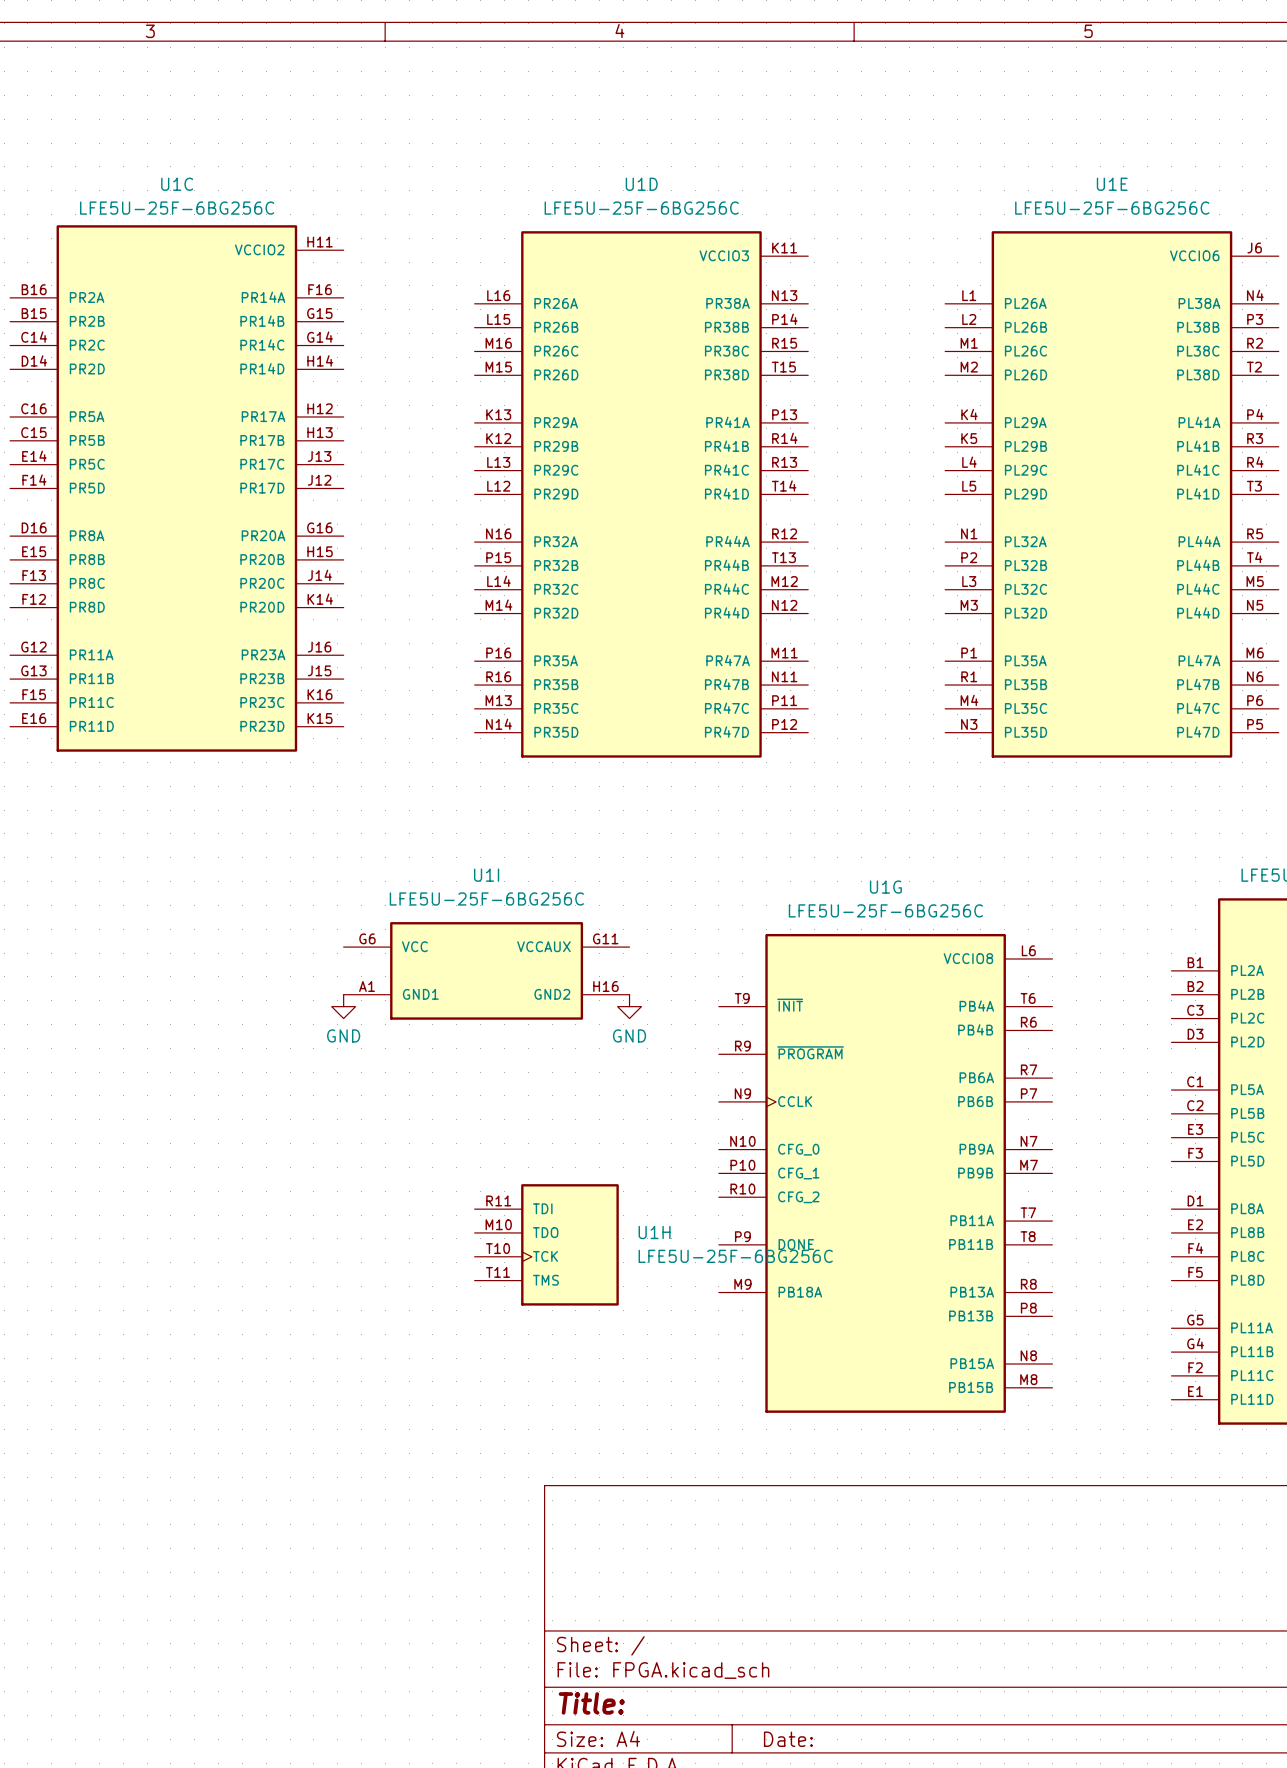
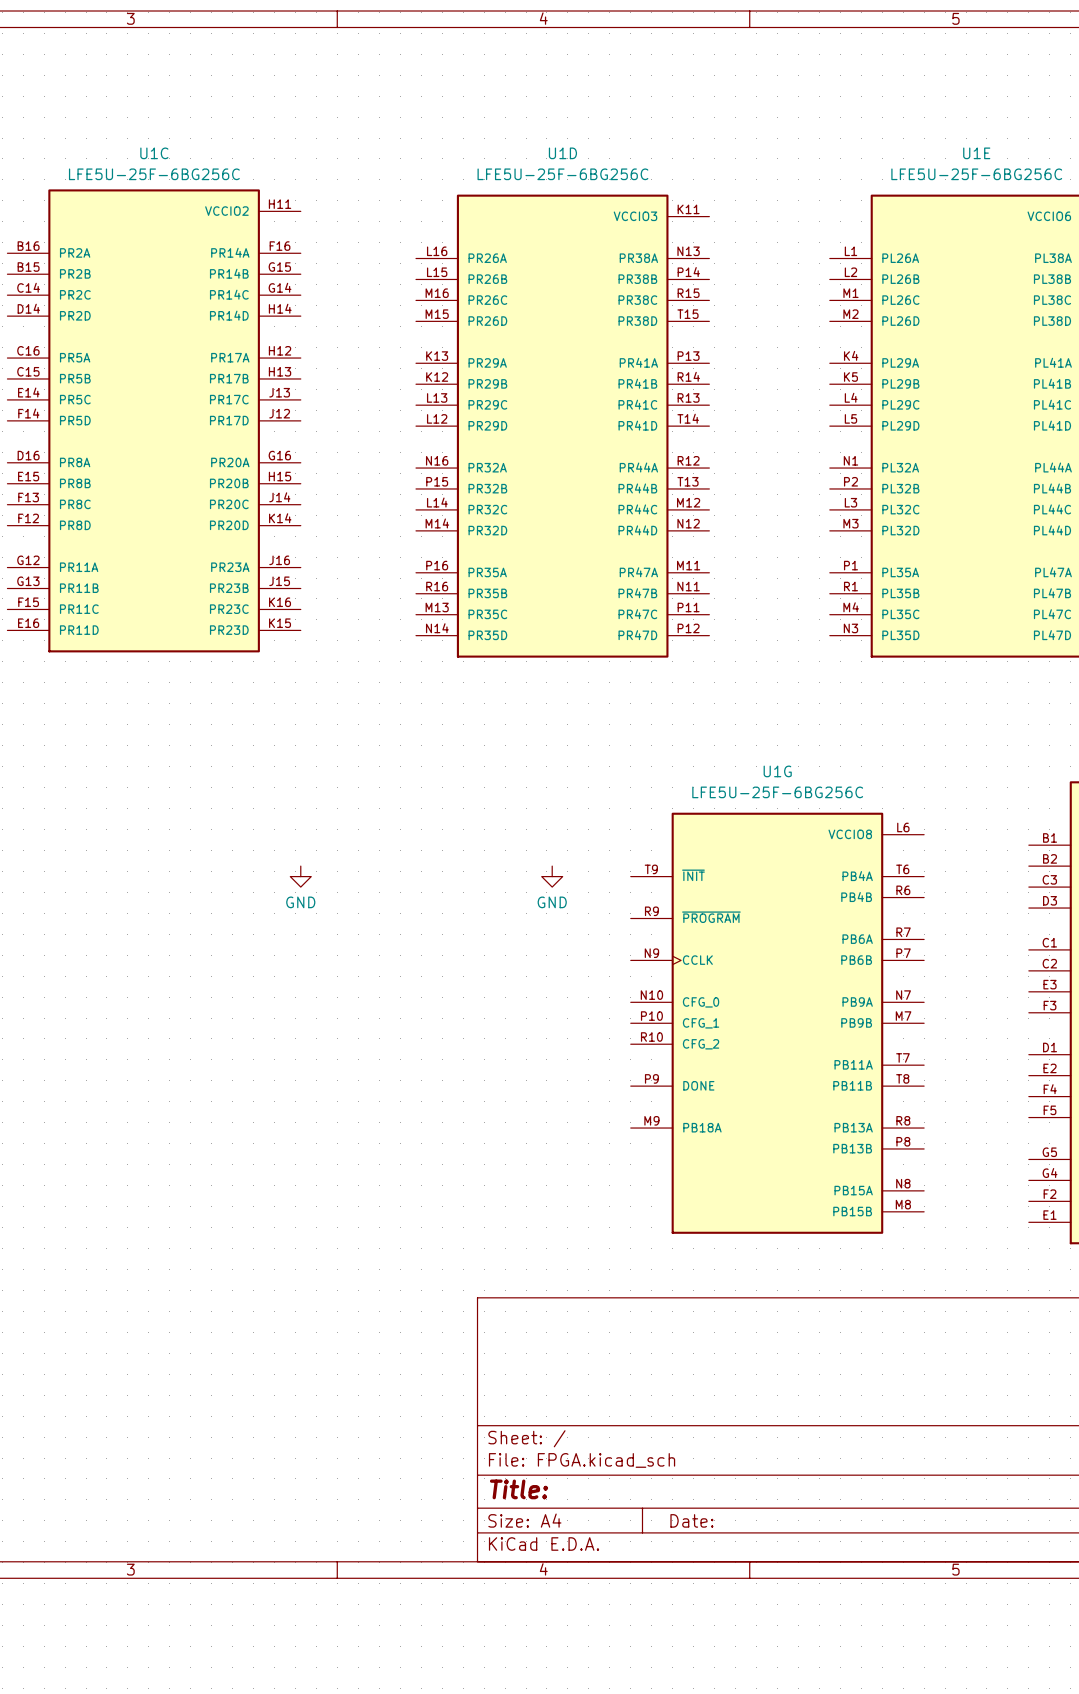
U1I: LFE5U-25F-6BG256C (486, 970) -> none
U1H: LFE5U-25F-6BG256C (546, 1244) -> none

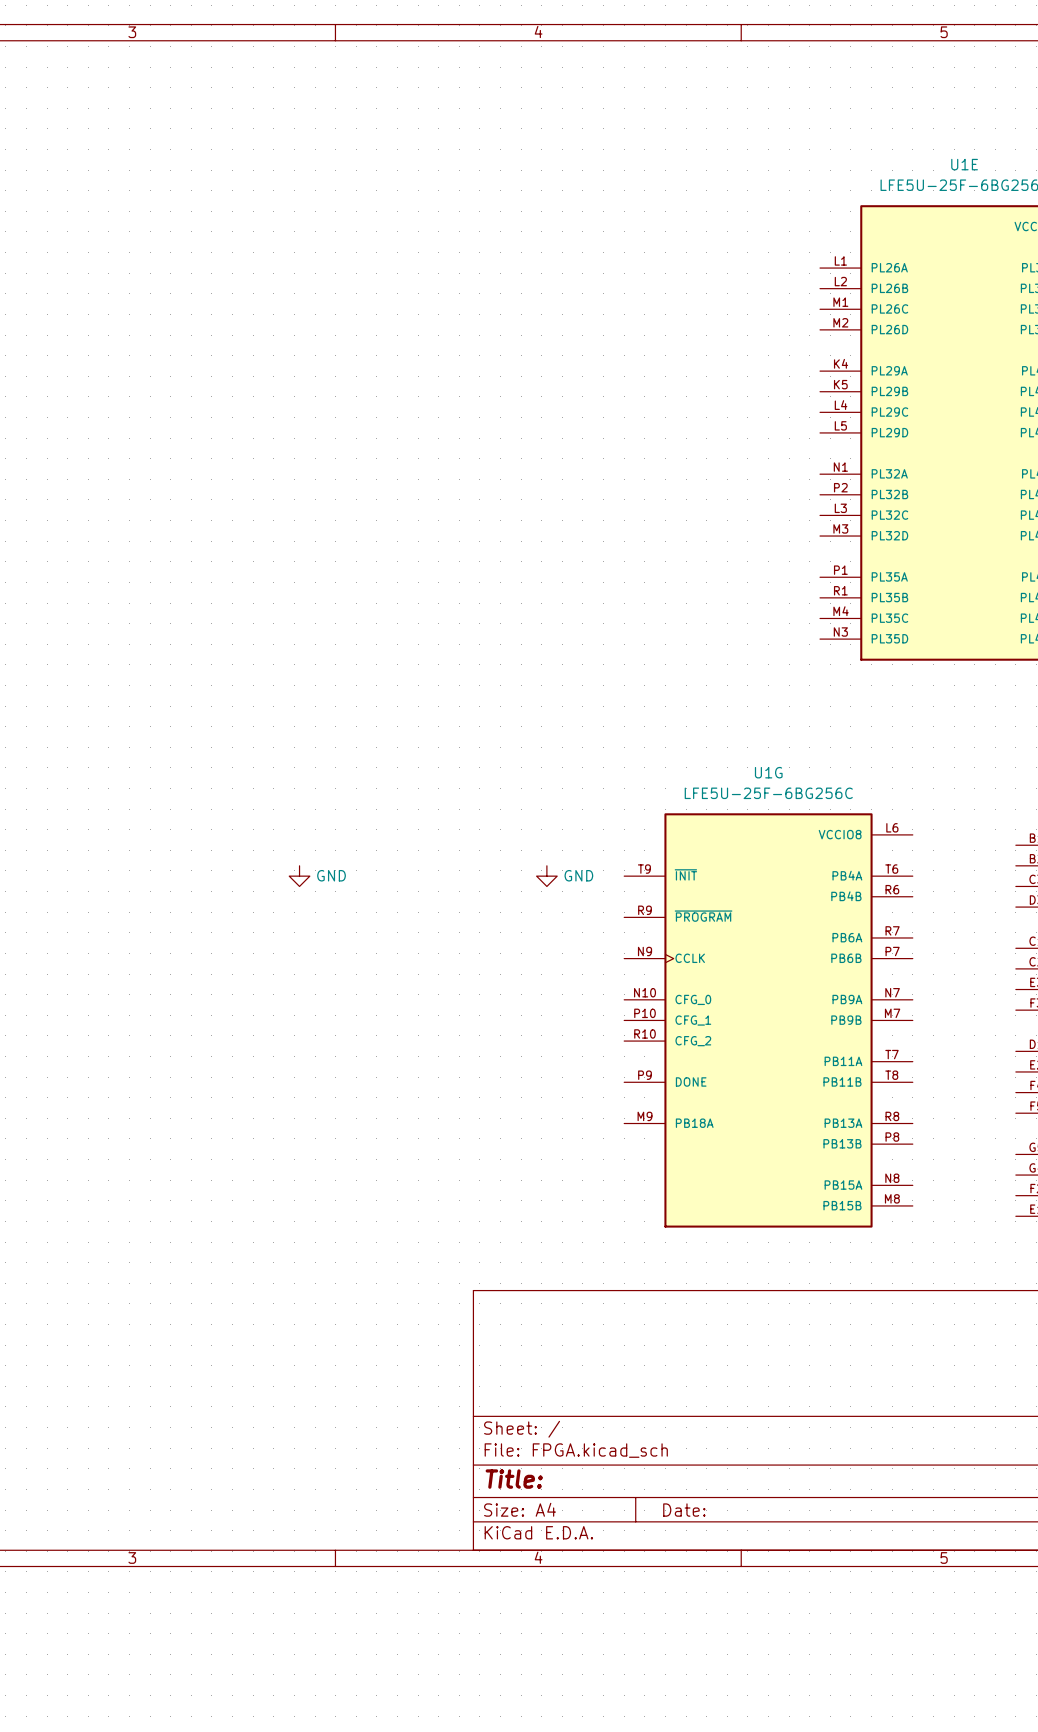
U1C: LFE5U-25F-6BG256C (154, 420) -> none
U1D: LFE5U-25F-6BG256C (562, 426) -> none
power symbol text position: GND (300, 902) -> GND (331, 875)
power symbol text position: GND (552, 902) -> GND (578, 875)

